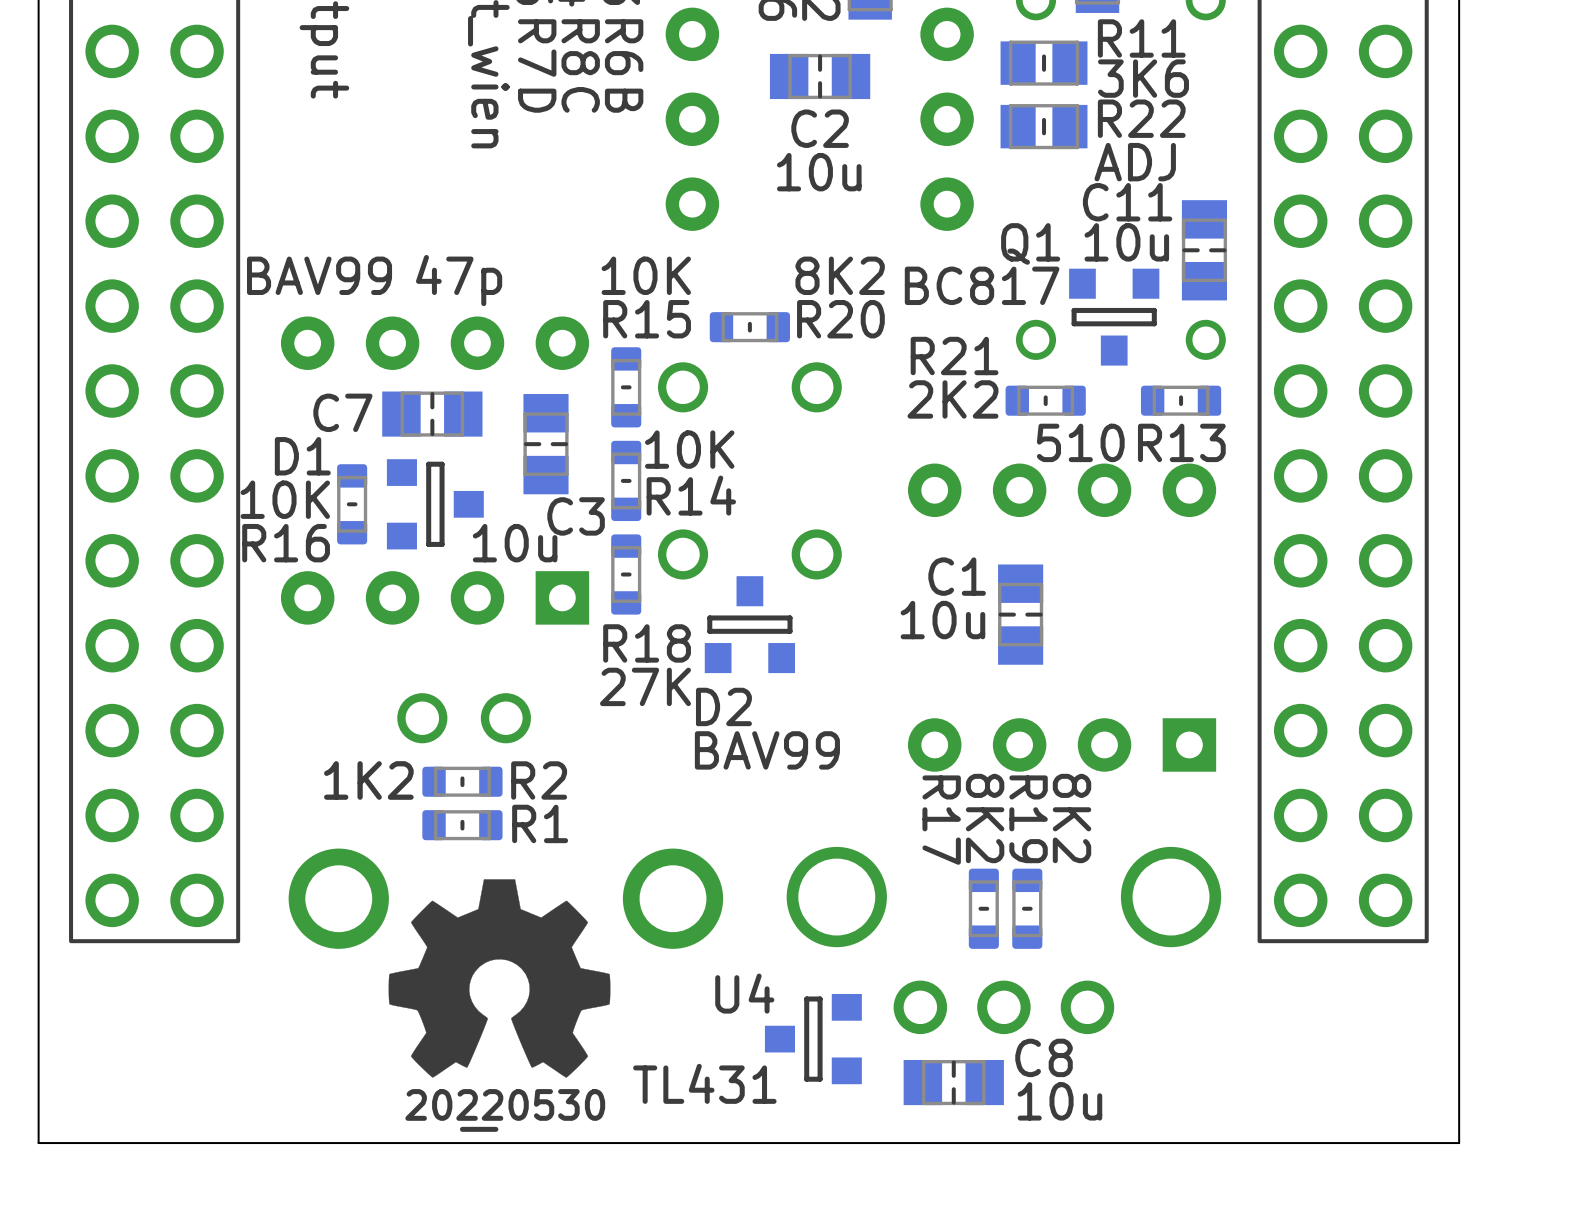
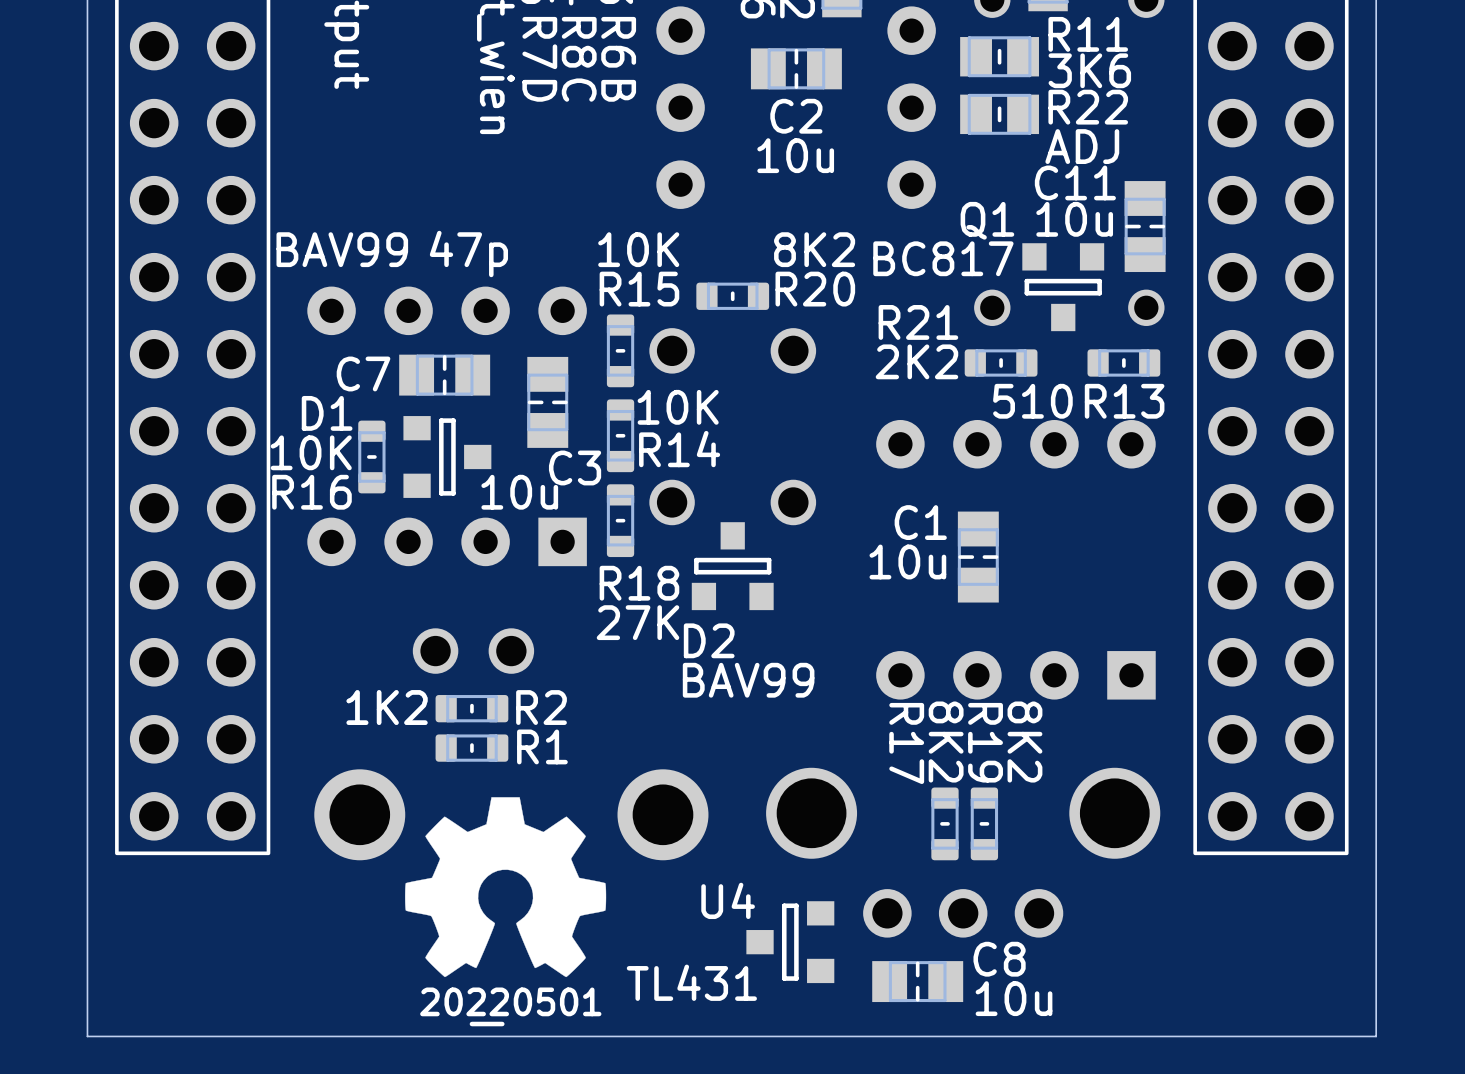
drawing shape: [405, 1089, 606, 1132] -> [420, 987, 602, 1027]

